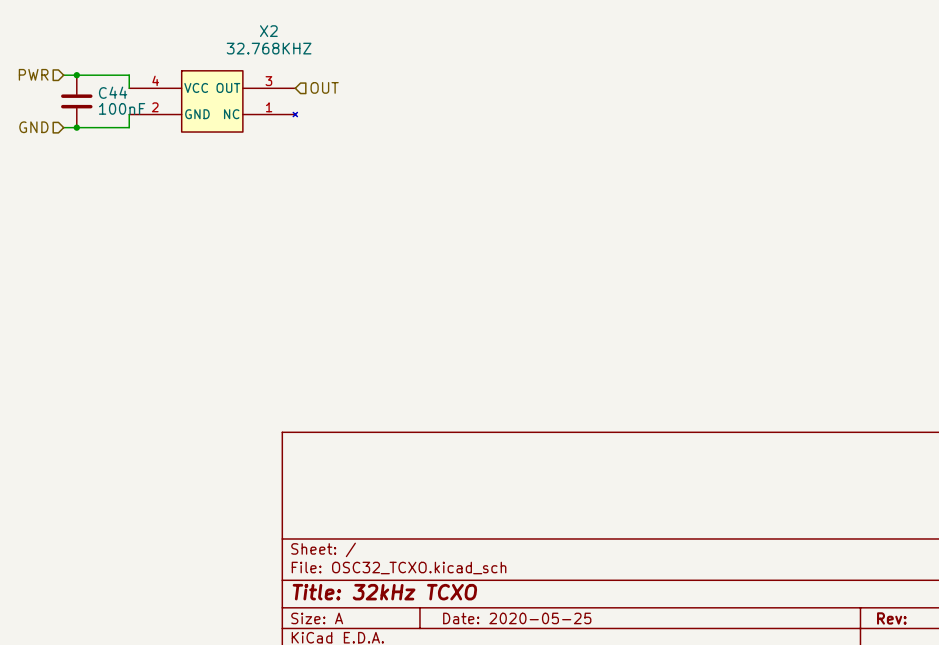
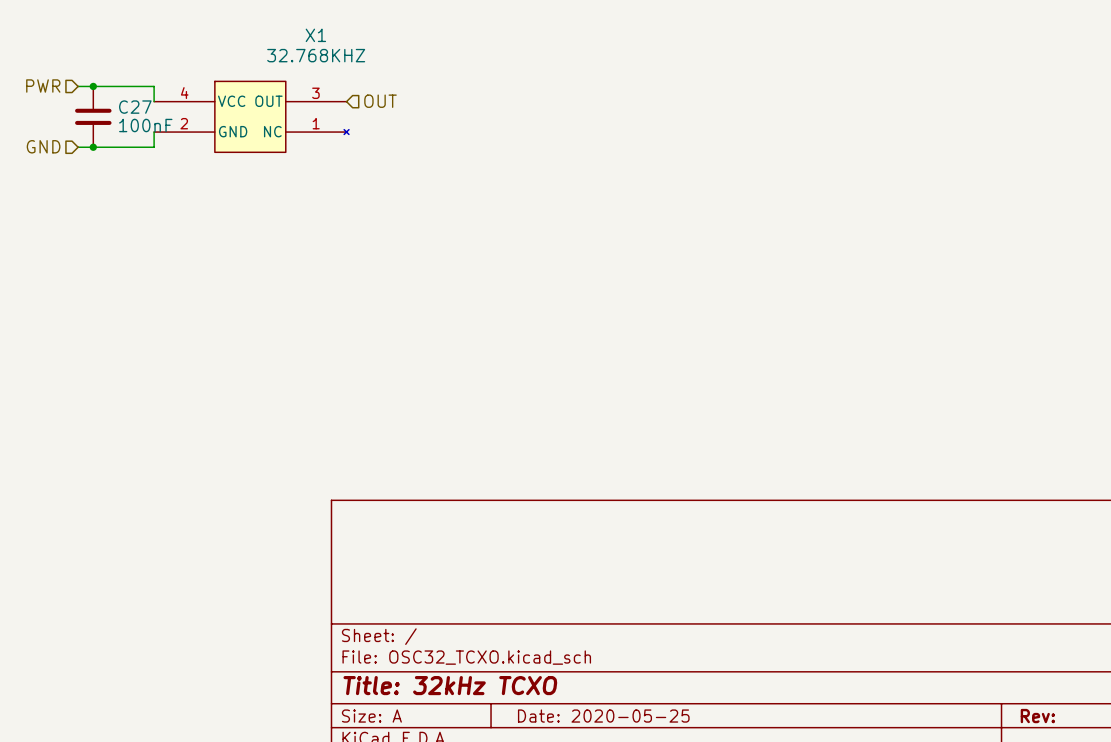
X2 name: X2 (268, 31) -> X1 (315, 35)
C44 name: C44 (113, 92) -> C27 (135, 107)

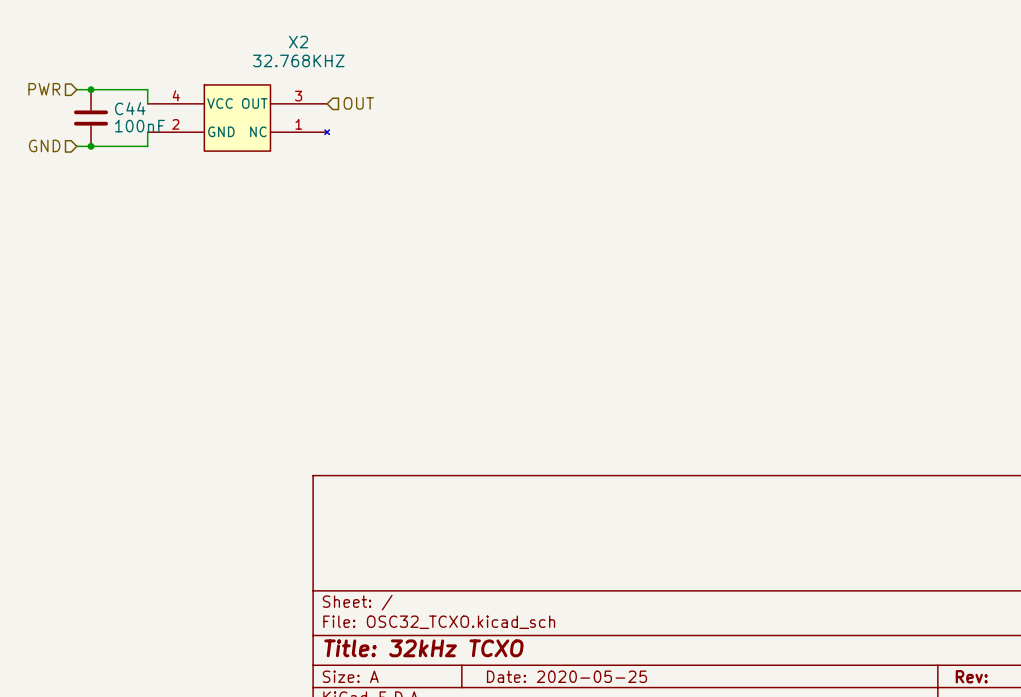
X1 name: X1 (315, 35) -> X2 (298, 42)
C27 name: C27 (135, 107) -> C44 (130, 108)

